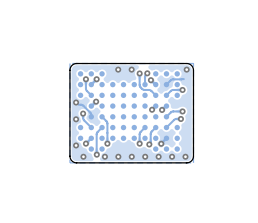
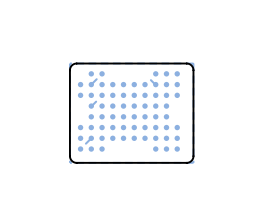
via: (118, 69) -> none
via: (131, 69) -> none
via: (186, 69) -> none
part footprint: [77, 71, 180, 152] -> [77, 71, 180, 152]
track: (139, 73) (140, 86) (143, 89) (150, 90) (155, 95) -> none
via: (139, 73) -> none
track: (147, 73) (145, 76) (145, 84) -> none
via: (147, 73) -> none
track: (85, 79) (86, 89) (91, 95) -> none
via: (85, 79) -> none
via: (96, 79) -> none
track: (183, 79) (172, 79) (166, 84) -> none
via: (150, 80) -> none
track: (182, 89) (172, 90) (166, 95) -> none
via: (182, 89) -> none
via: (96, 101) -> none
via: (76, 102) -> none
track: (78, 104) (83, 105) (90, 113) (91, 116) -> none
via: (152, 109) -> none
via: (162, 109) -> none
track: (182, 111) (172, 111) (166, 116) -> none
via: (182, 111) -> none
track: (83, 113) (83, 119) (91, 127) -> none
via: (83, 113) -> none
track: (102, 116) (107, 122) (107, 143) -> none
track: (180, 118) (174, 119) (166, 127) -> none
via: (180, 118) -> none
via: (76, 119) -> none
track: (102, 127) (96, 133) (96, 154) -> none
track: (145, 127) (139, 133) (139, 143) -> none
track: (155, 127) (150, 132) (149, 144) -> none
via: (85, 143) -> none
via: (107, 143) -> none
via: (139, 143) -> none
via: (161, 143) -> none
via: (149, 144) -> none
via: (76, 145) -> none
via: (96, 154) -> none
via: (83, 156) -> none
via: (104, 156) -> none
via: (118, 156) -> none
via: (131, 156) -> none
via: (145, 156) -> none
via: (158, 156) -> none
via: (172, 156) -> none
via: (185, 156) -> none

